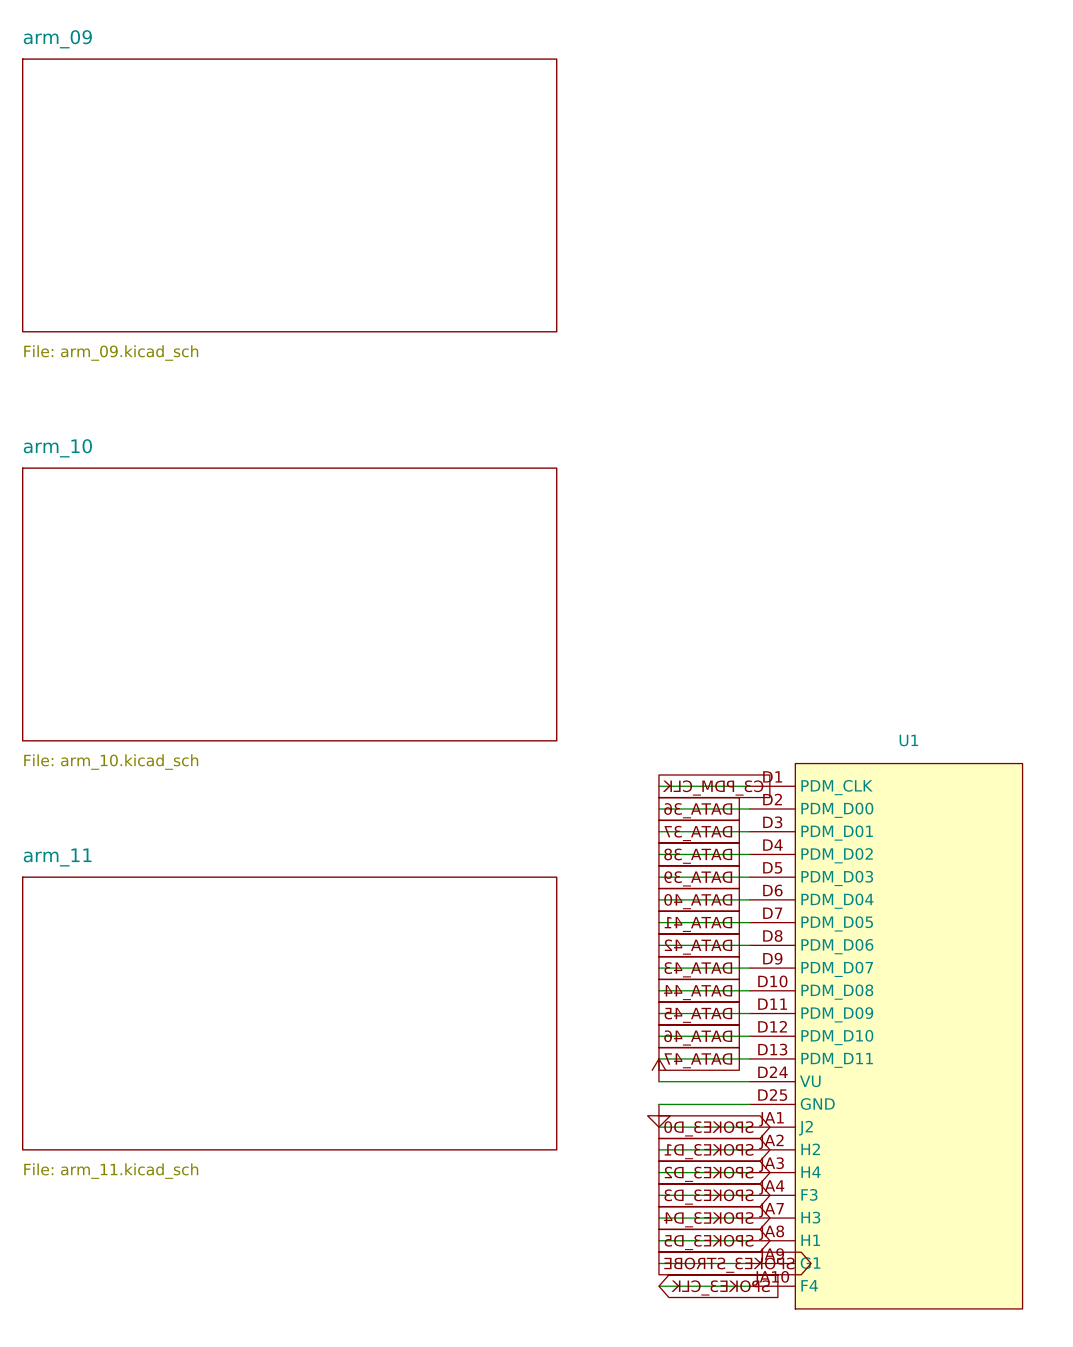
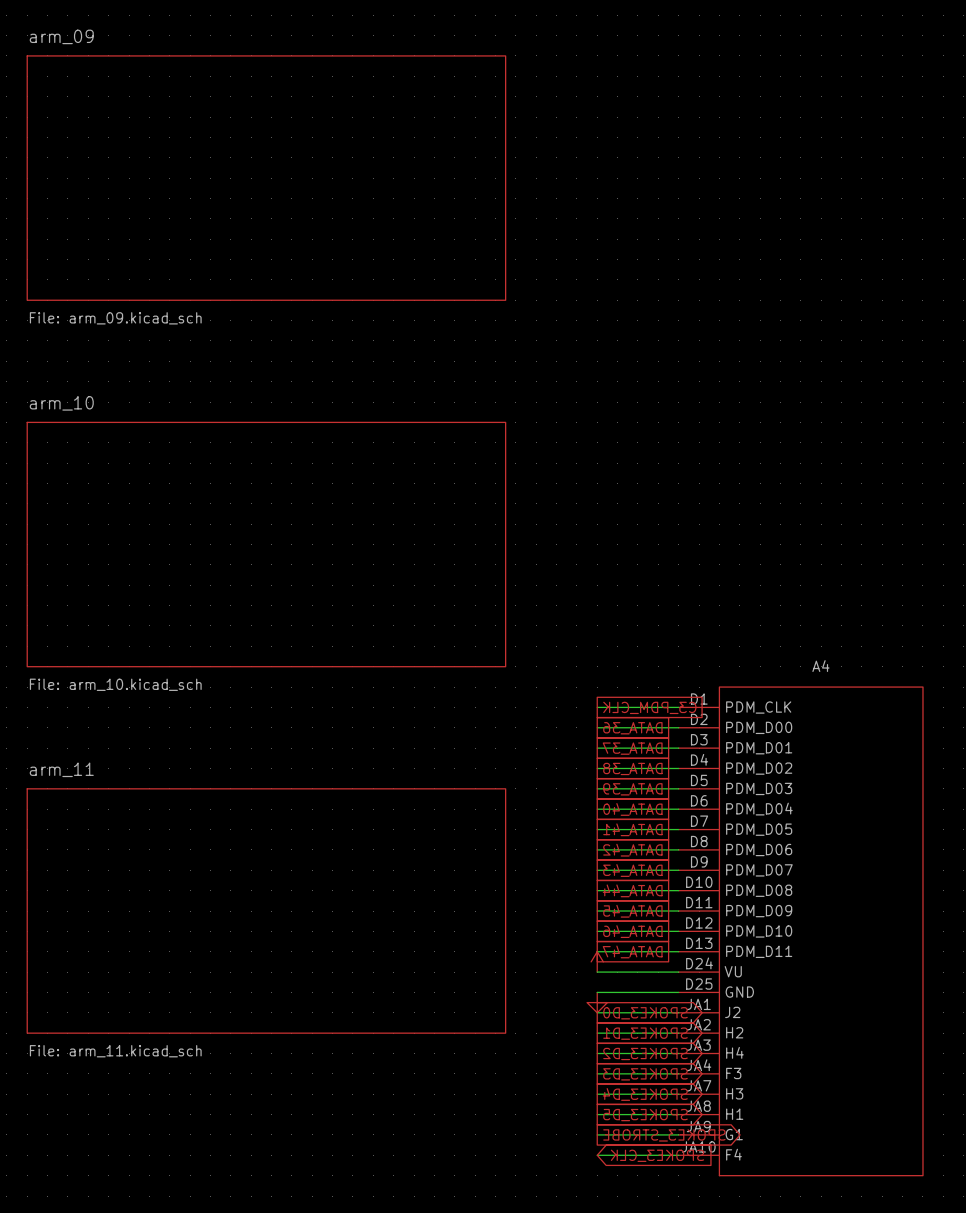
U1 name: U1 (908, 740) -> A4 (820, 666)

